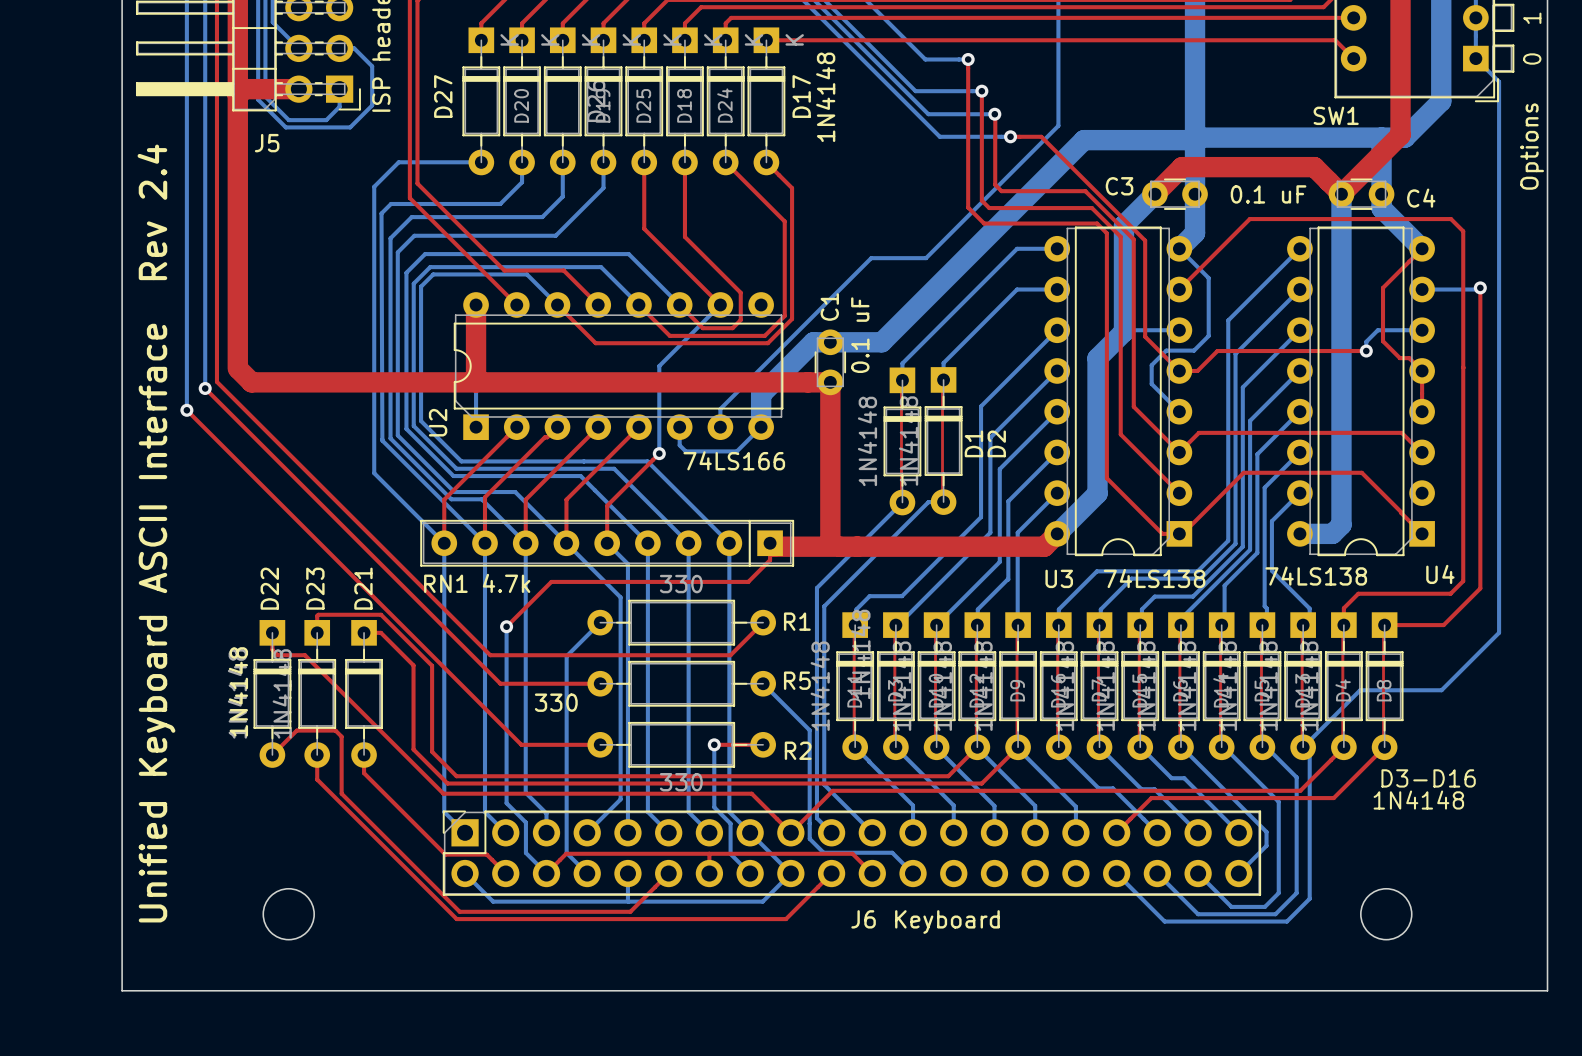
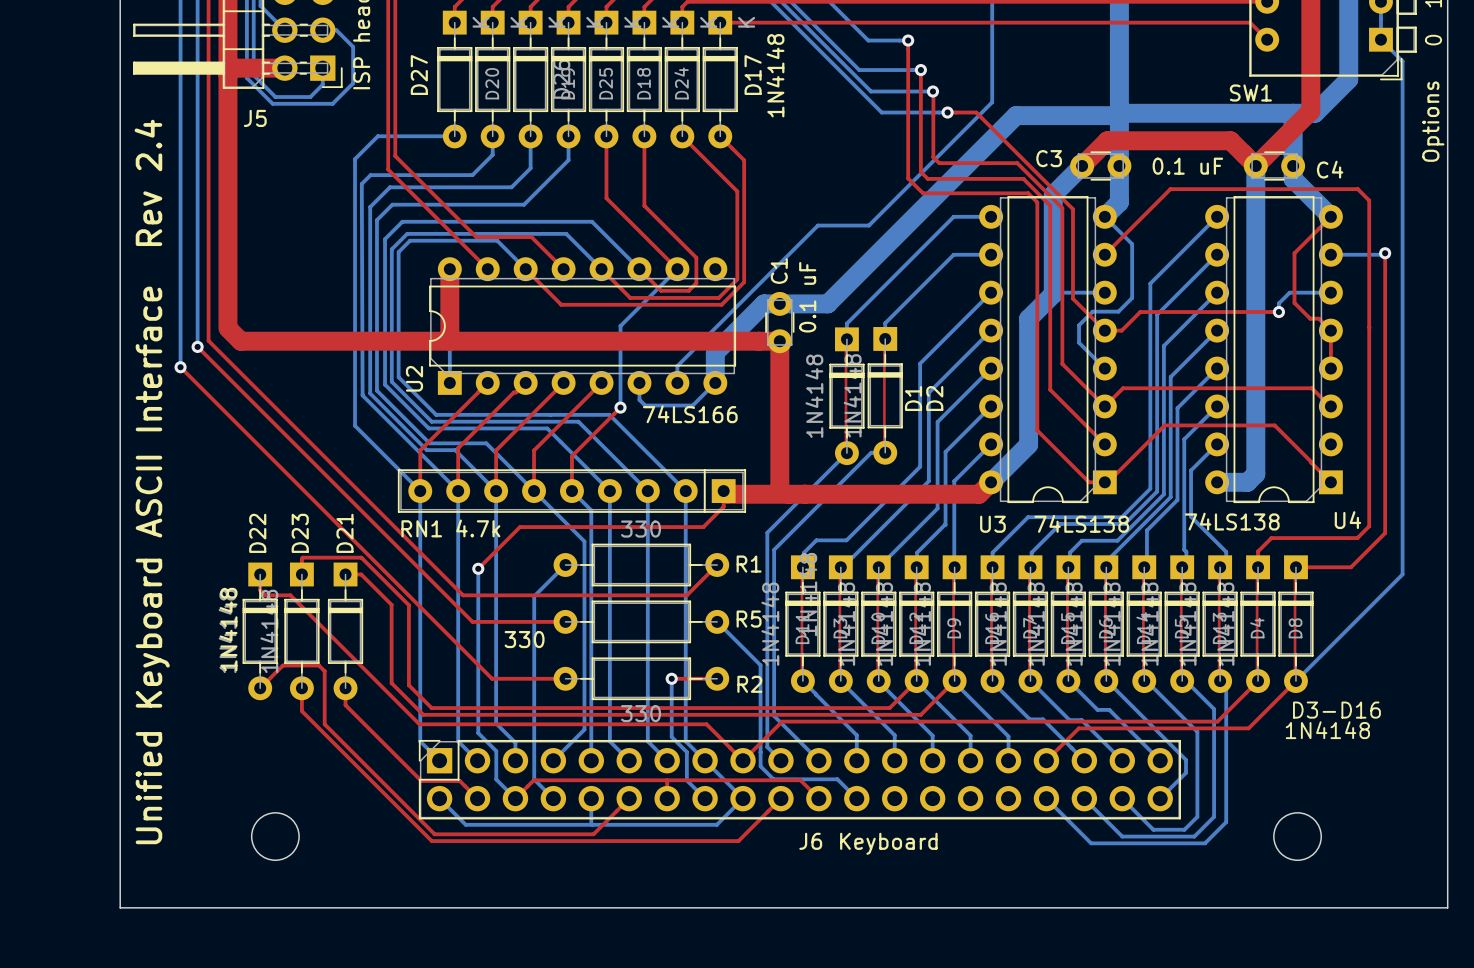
bottom track: (1441, 690) (1360, 690) (1303, 747) -> (1349, 627) (1295, 681)

